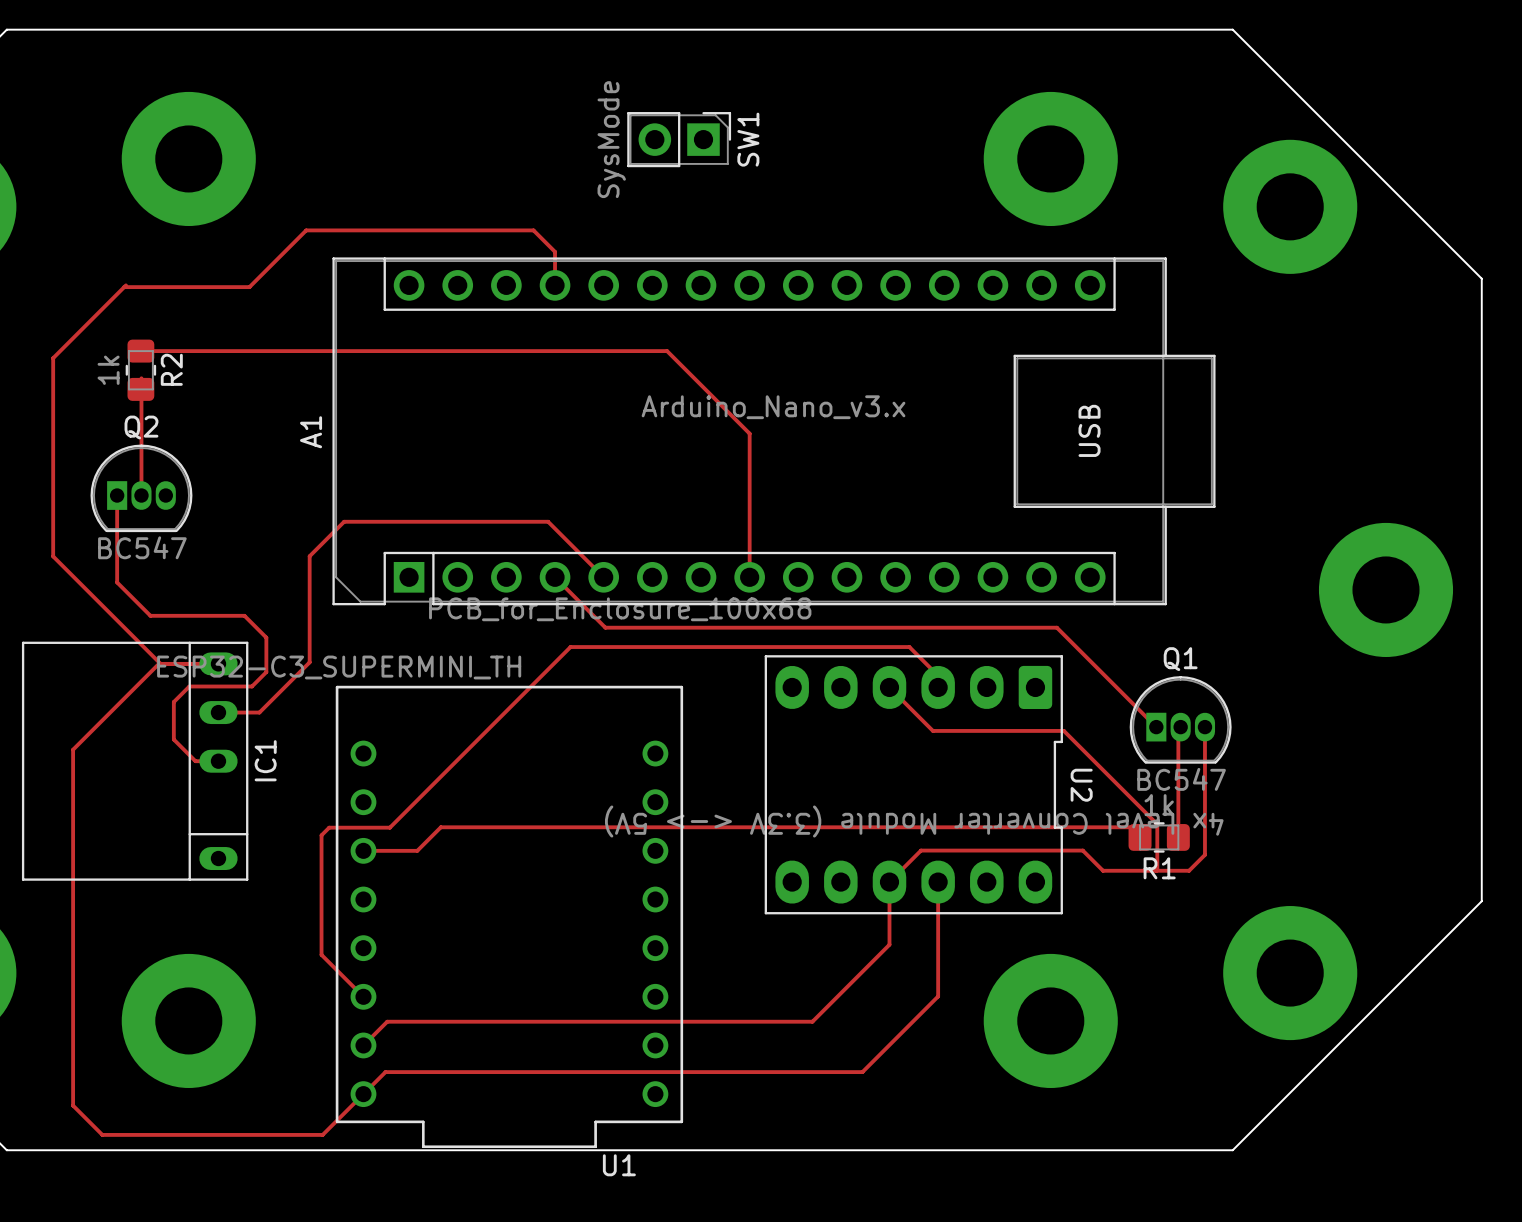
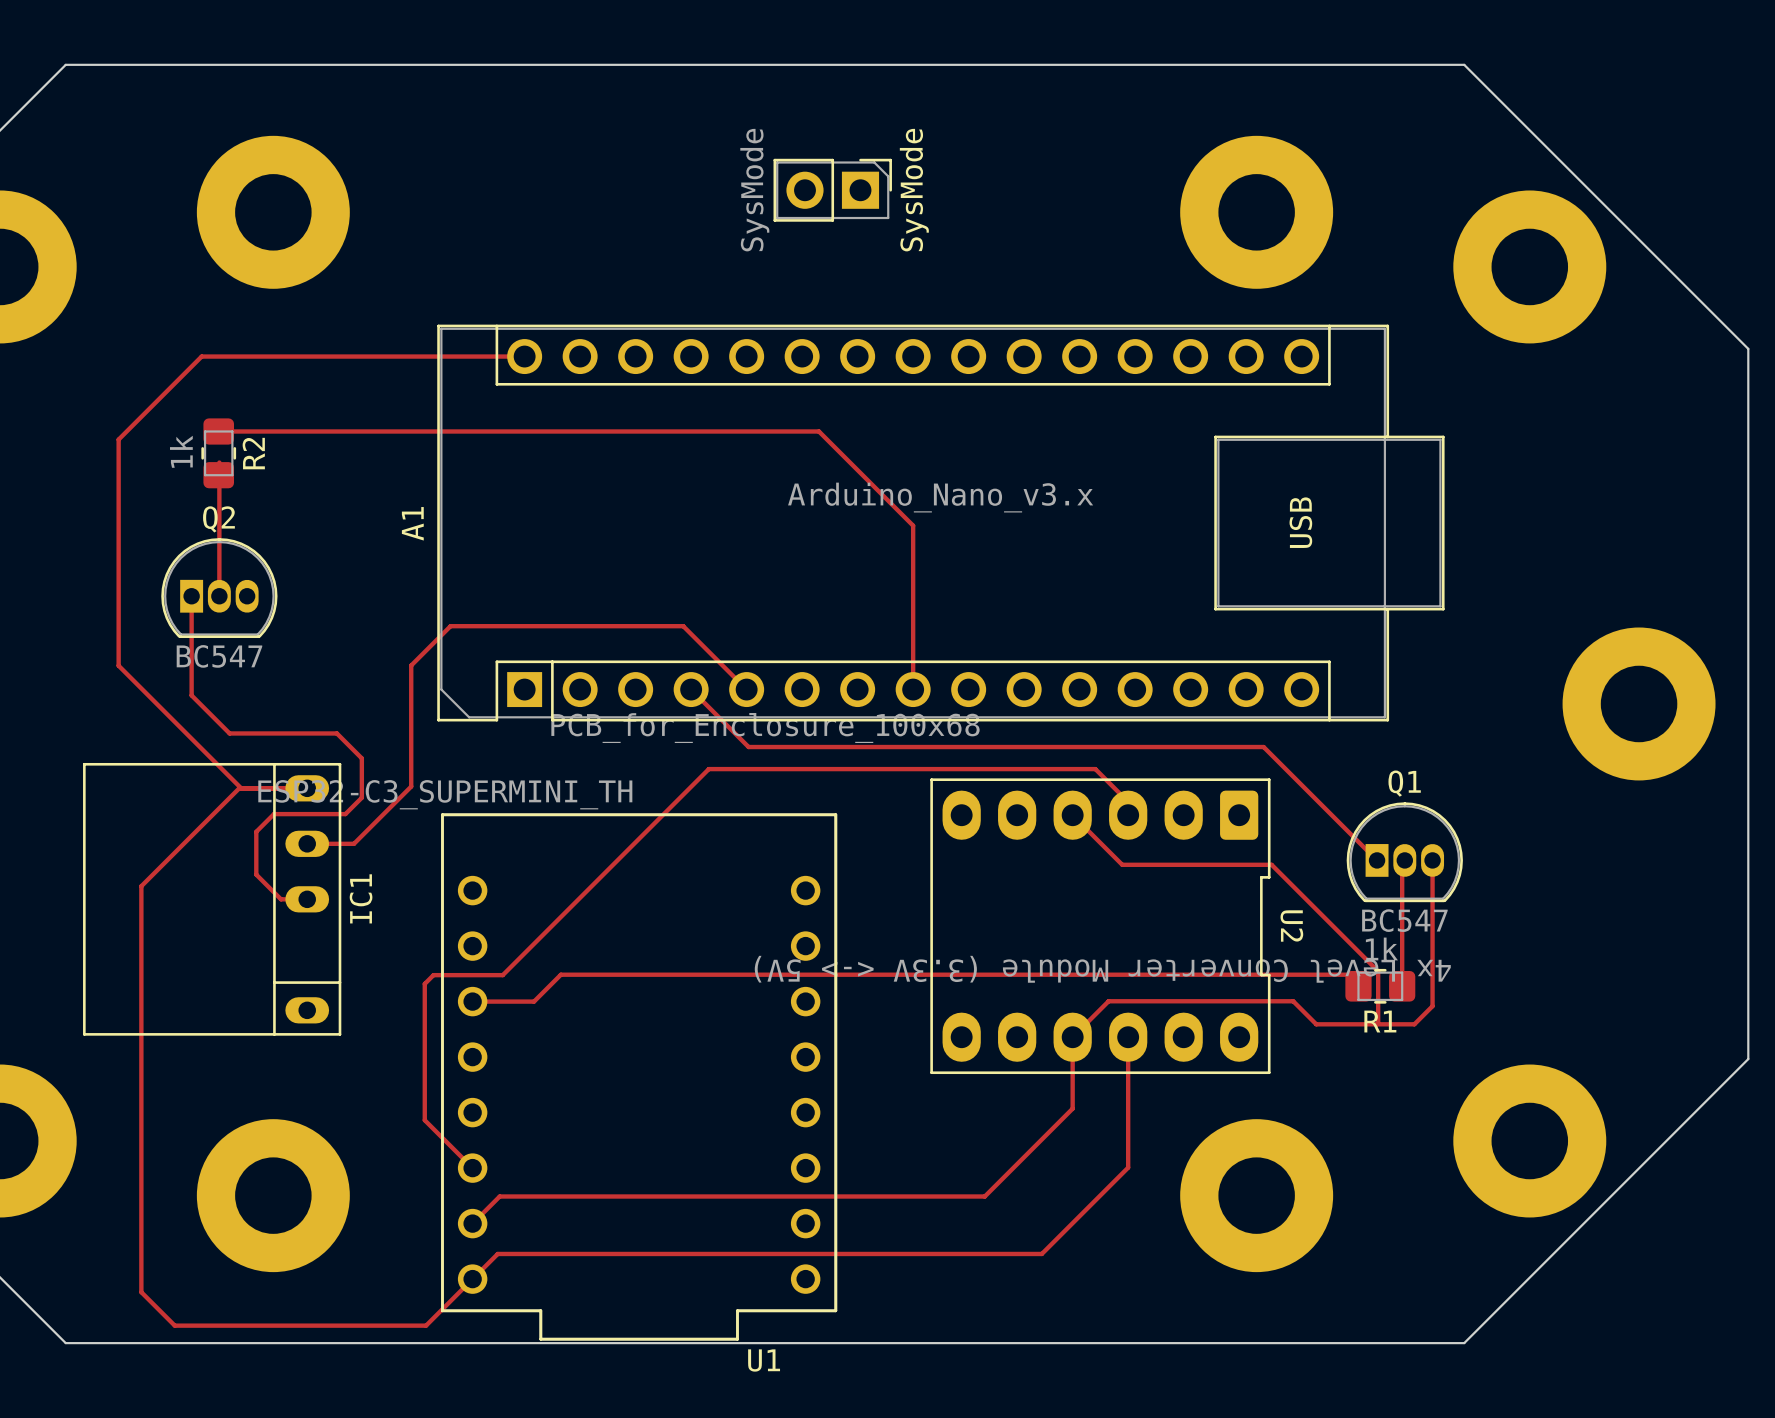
SW1 name: SW1 (748, 139) -> SysMode (914, 190)
track: none -> (201, 356) (524, 356)
track: (555, 285) (555, 251) (533, 230) (306, 230) (249, 287) (124, 287) -> none

